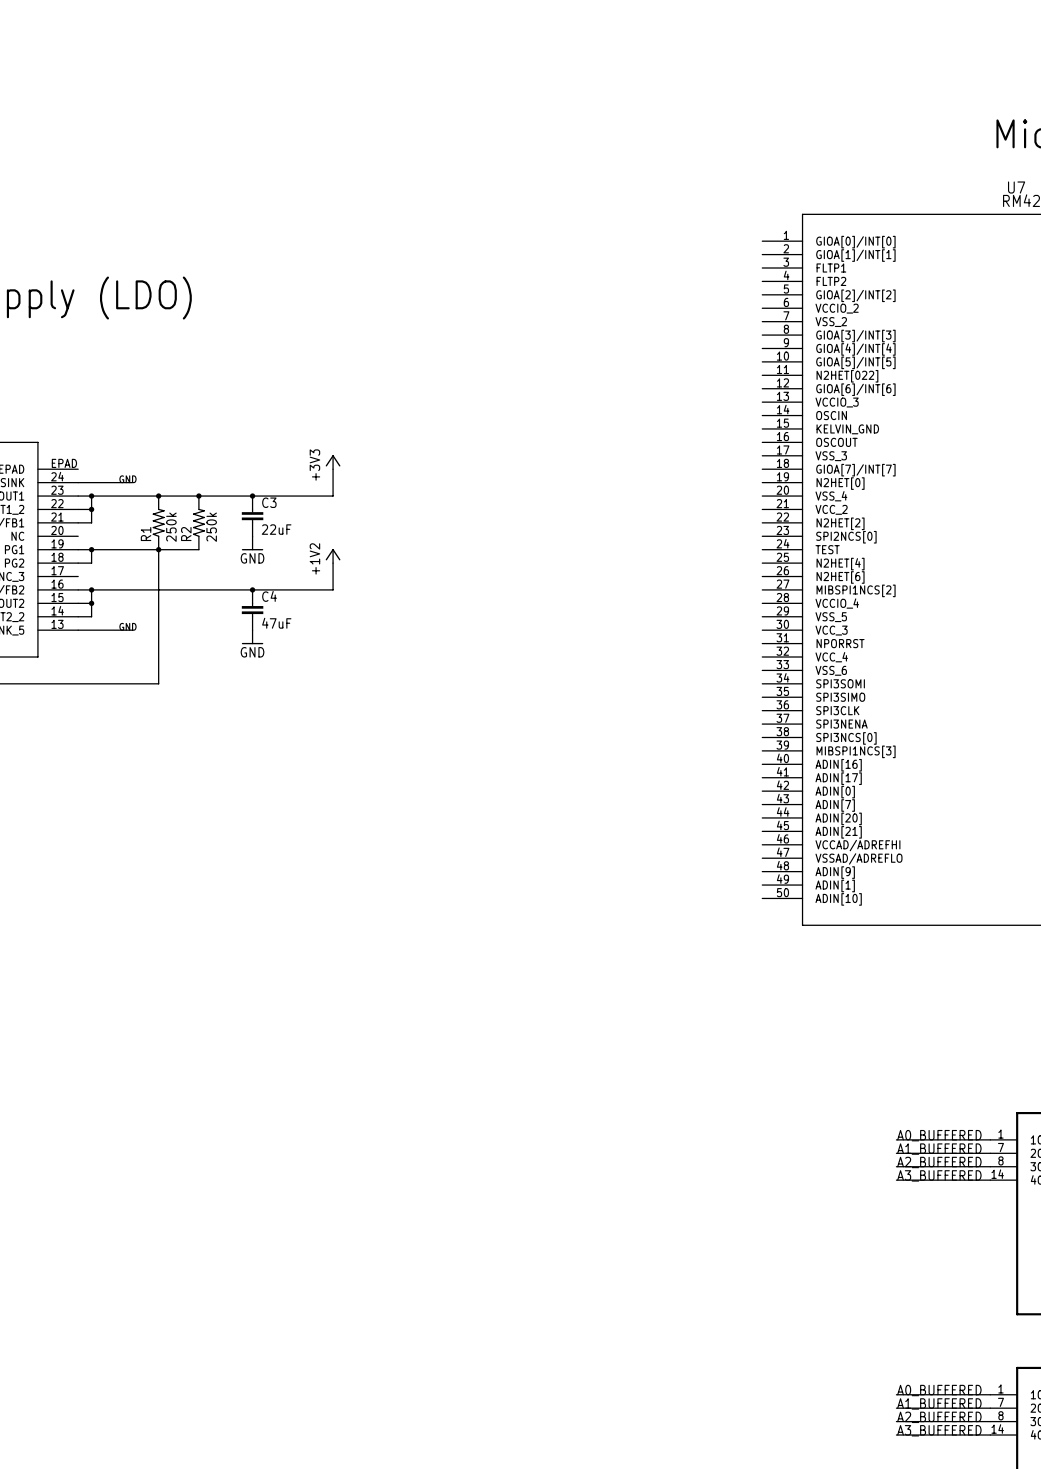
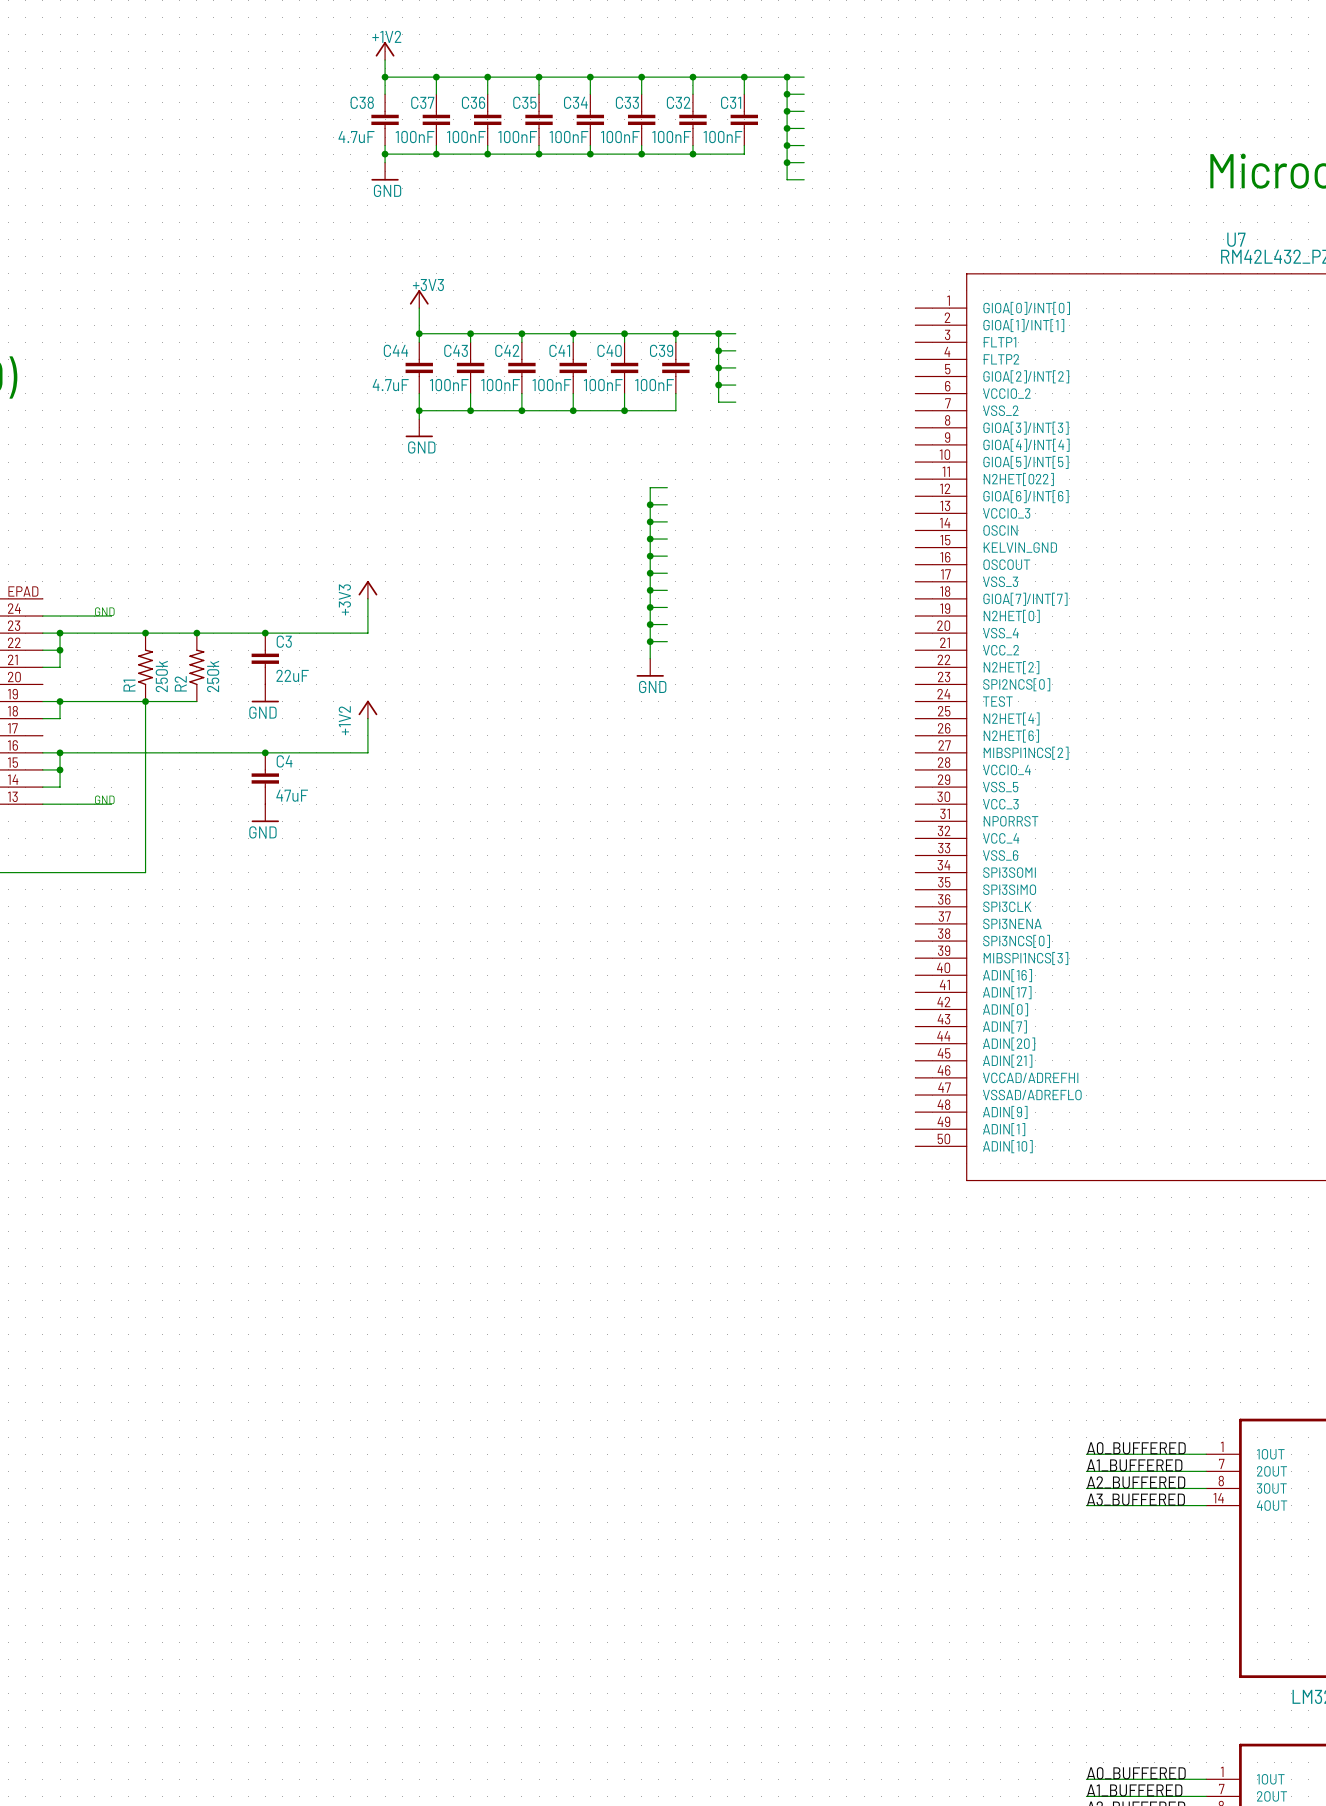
power symbol: none -> +1V2 (385, 51)
wire: none -> (385, 60) (385, 94)
wire: none -> (385, 77) (804, 77)
junction: none -> (385, 77)
wire: none -> (436, 77) (436, 94)
junction: none -> (436, 77)
wire: none -> (487, 77) (487, 94)
junction: none -> (487, 77)
wire: none -> (539, 77) (539, 94)
junction: none -> (539, 77)
wire: none -> (590, 77) (590, 94)
junction: none -> (590, 77)
wire: none -> (641, 77) (641, 94)
junction: none -> (641, 77)
wire: none -> (692, 77) (692, 94)
junction: none -> (692, 77)
wire: none -> (744, 77) (744, 94)
junction: none -> (744, 77)
wire: none -> (787, 77) (787, 179) (804, 179)
junction: none -> (787, 77)
wire: none -> (787, 94) (804, 94)
junction: none -> (787, 94)
wire: none -> (787, 111) (804, 111)
junction: none -> (787, 111)
C38: none -> 4.7uF (385, 119)
C37: none -> 100nF (436, 119)
C36: none -> 100nF (487, 119)
C35: none -> 100nF (539, 119)
C34: none -> 100nF (590, 119)
C33: none -> 100nF (641, 119)
C32: none -> 100nF (692, 119)
C31: none -> 100nF (744, 119)
wire: none -> (787, 128) (804, 128)
junction: none -> (787, 128)
wire: none -> (385, 145) (385, 162)
wire: none -> (436, 145) (436, 154)
wire: none -> (487, 145) (487, 154)
wire: none -> (539, 145) (539, 154)
wire: none -> (590, 145) (590, 154)
wire: none -> (641, 145) (641, 154)
wire: none -> (692, 145) (692, 154)
wire: none -> (744, 145) (744, 154) (385, 154)
wire: none -> (787, 145) (804, 145)
junction: none -> (787, 145)
junction: none -> (385, 154)
junction: none -> (436, 154)
junction: none -> (487, 154)
junction: none -> (539, 154)
junction: none -> (590, 154)
junction: none -> (641, 154)
junction: none -> (692, 154)
wire: none -> (787, 162) (804, 162)
junction: none -> (787, 162)
power symbol: none -> GND (385, 171)
power symbol: none -> +3V3 (419, 299)
wire: none -> (419, 308) (419, 342)
wire: none -> (419, 333) (735, 333)
junction: none -> (419, 333)
wire: none -> (470, 333) (470, 342)
junction: none -> (470, 333)
wire: none -> (521, 333) (521, 342)
junction: none -> (521, 333)
wire: none -> (573, 333) (573, 342)
junction: none -> (573, 333)
wire: none -> (624, 333) (624, 342)
junction: none -> (624, 333)
wire: none -> (675, 333) (675, 342)
junction: none -> (675, 333)
wire: none -> (718, 333) (718, 402) (735, 402)
junction: none -> (718, 333)
wire: none -> (718, 350) (735, 350)
junction: none -> (718, 350)
C44: none -> 4.7uF (419, 367)
C43: none -> 100nF (470, 367)
C42: none -> 100nF (521, 367)
C41: none -> 100nF (573, 367)
C40: none -> 100nF (624, 367)
C39: none -> 100nF (675, 367)
wire: none -> (718, 367) (735, 367)
junction: none -> (718, 367)
wire: none -> (718, 385) (735, 385)
junction: none -> (718, 385)
wire: none -> (419, 393) (419, 419)
wire: none -> (470, 393) (470, 410)
wire: none -> (521, 393) (521, 410)
wire: none -> (573, 393) (573, 410)
wire: none -> (624, 393) (624, 410)
wire: none -> (675, 393) (675, 410) (419, 410)
junction: none -> (419, 410)
junction: none -> (470, 410)
junction: none -> (521, 410)
junction: none -> (573, 410)
junction: none -> (624, 410)
power symbol: none -> GND (419, 428)
wire: none -> (667, 487) (650, 487) (650, 658)
wire: none -> (650, 504) (667, 504)
junction: none -> (650, 504)
wire: none -> (650, 521) (667, 521)
junction: none -> (650, 521)
wire: none -> (650, 539) (667, 539)
junction: none -> (650, 539)
wire: none -> (650, 556) (667, 556)
junction: none -> (650, 556)
wire: none -> (650, 573) (667, 573)
junction: none -> (650, 573)
wire: none -> (650, 590) (667, 590)
junction: none -> (650, 590)
wire: none -> (650, 607) (667, 607)
junction: none -> (650, 607)
wire: none -> (650, 624) (667, 624)
junction: none -> (650, 624)
wire: none -> (650, 641) (667, 641)
junction: none -> (650, 641)
power symbol: none -> GND (650, 667)

